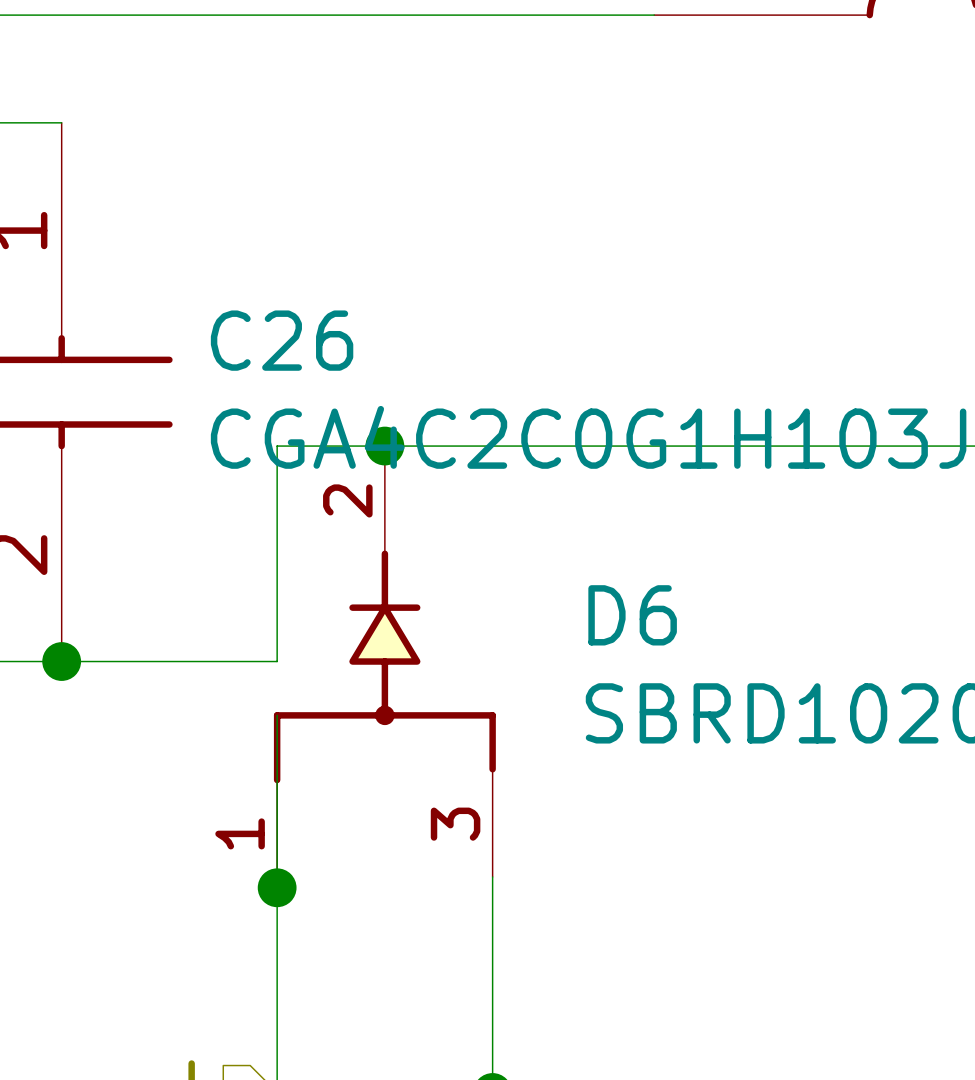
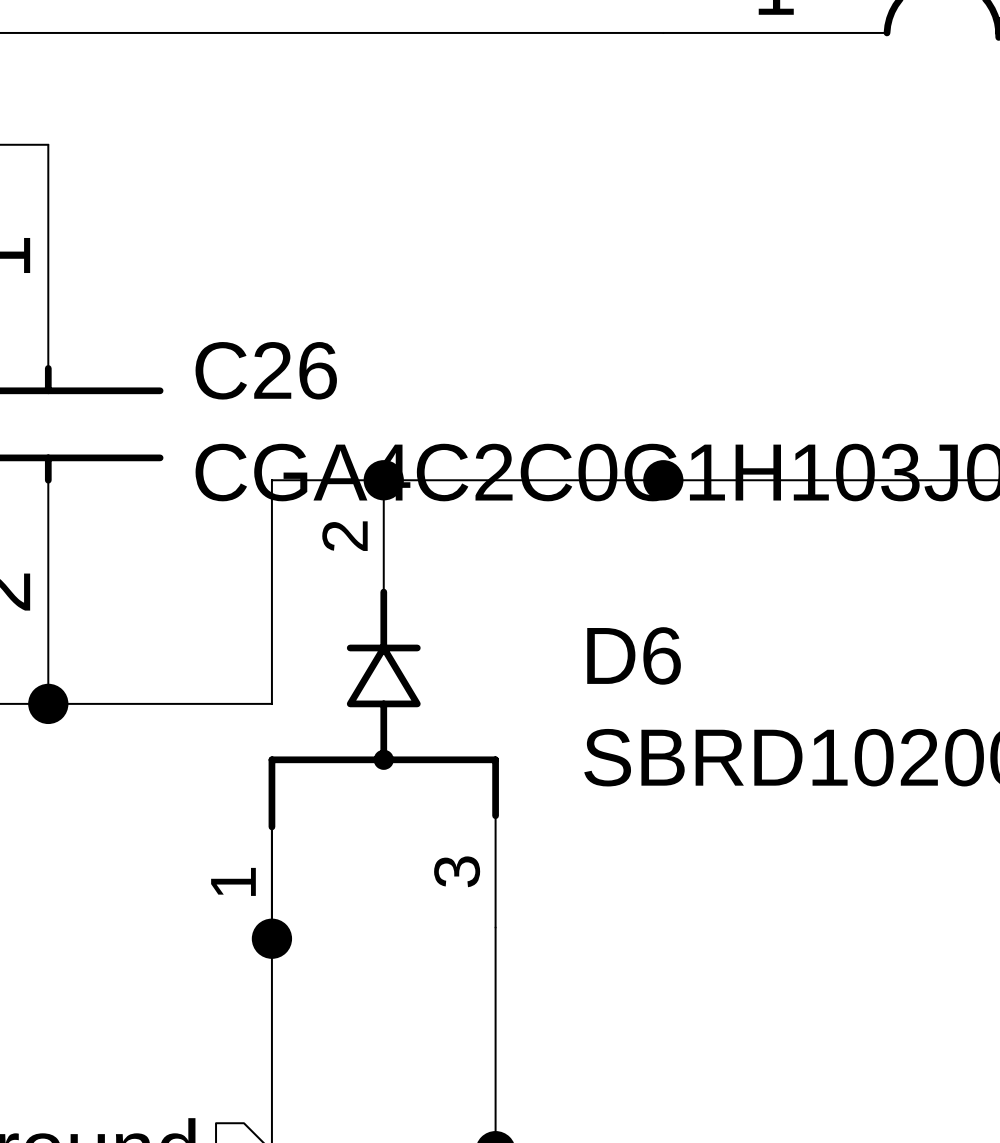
junction: none -> (663, 480)

